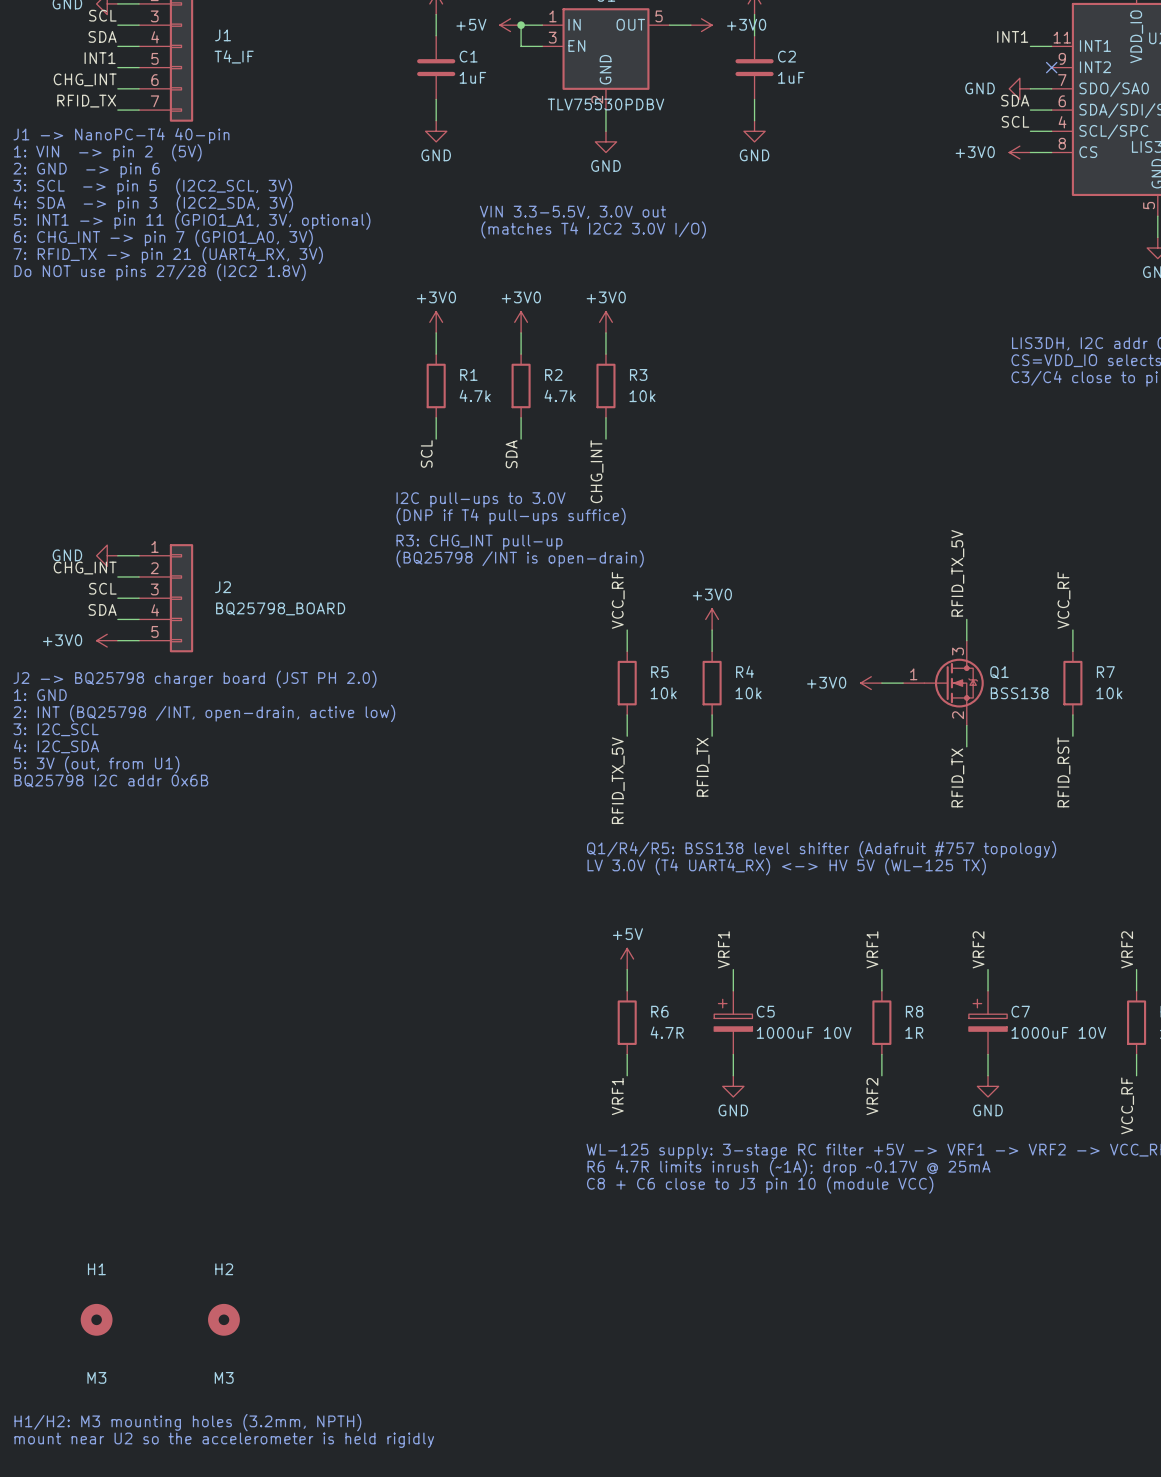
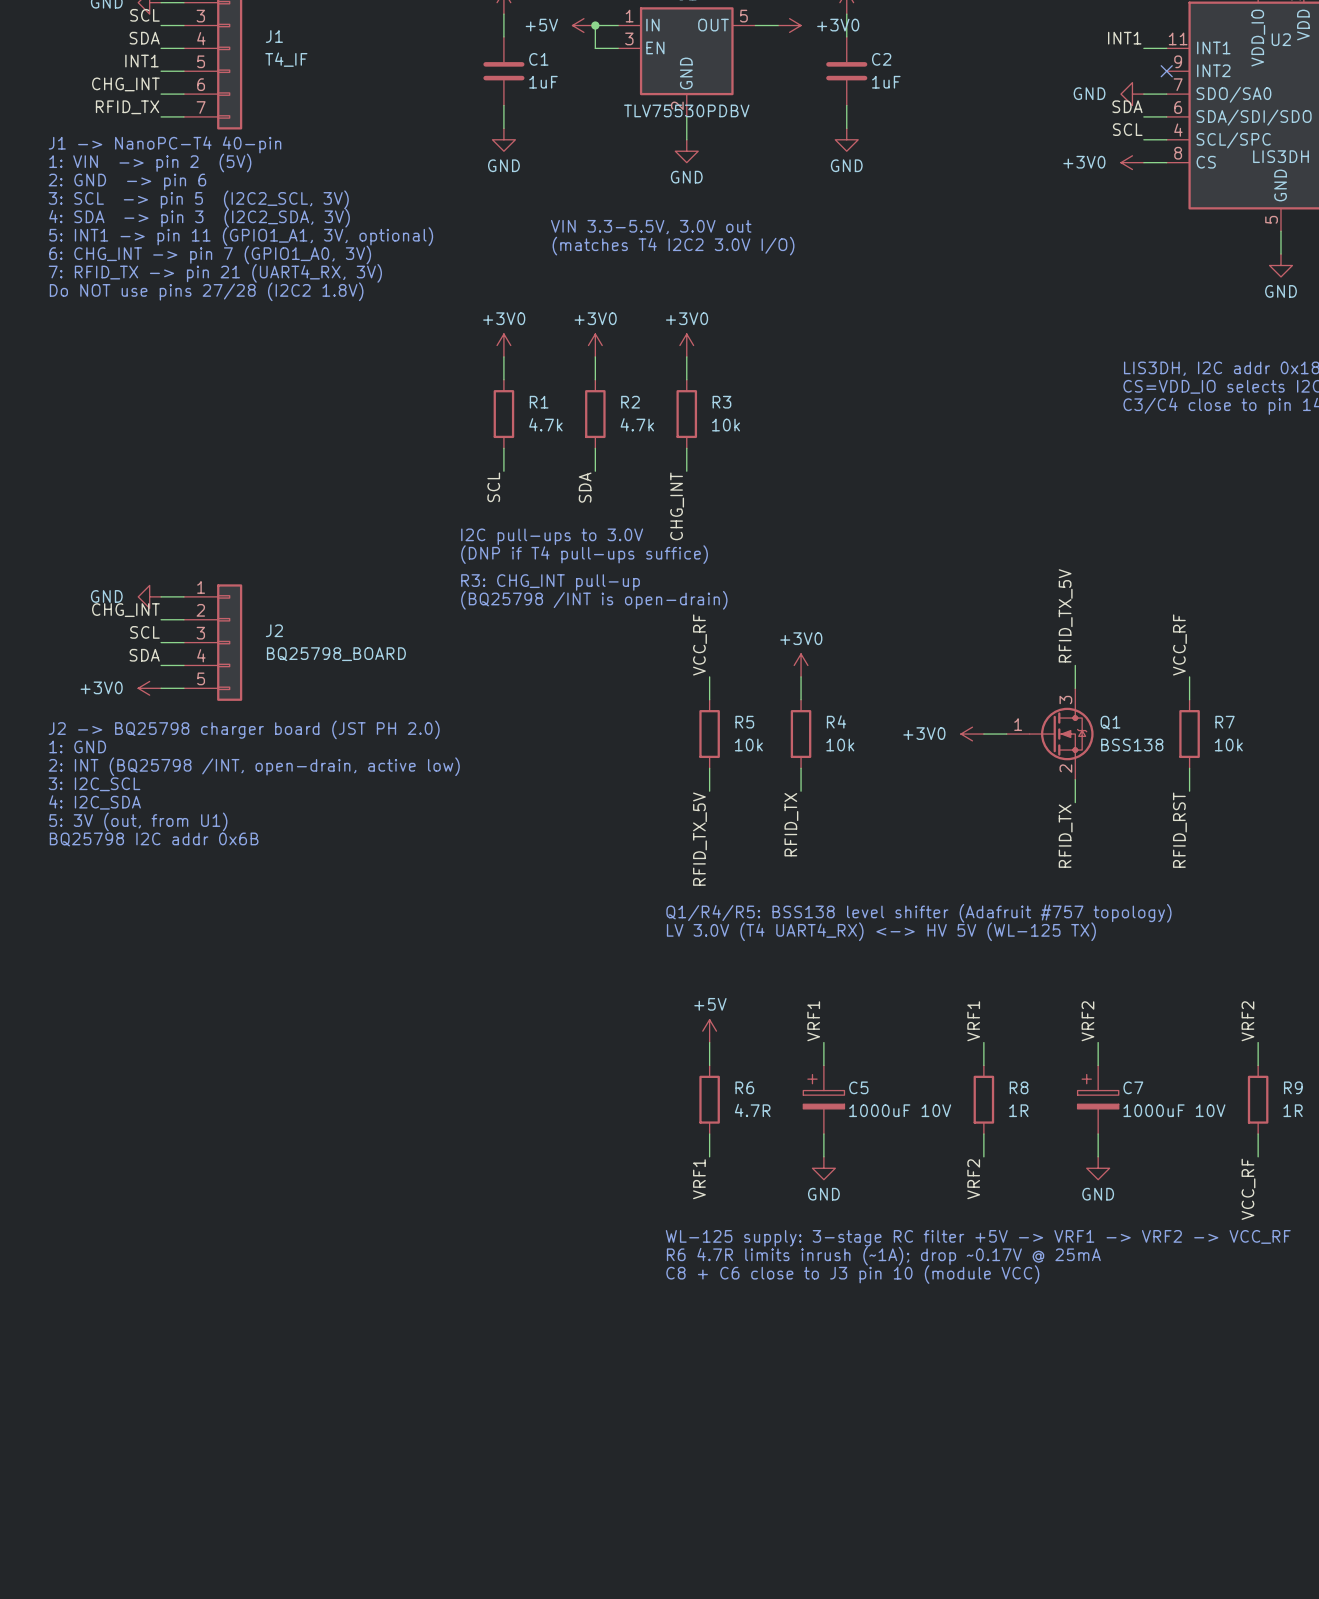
H1: M3 (96, 1319) -> none
H2: M3 (223, 1319) -> none
text: H1/H2: M3 mounting holes (3.2mm, NPTH) (187, 1422) -> none
text: mount near U2 so the accelerometer is held rigidly (224, 1440) -> none

